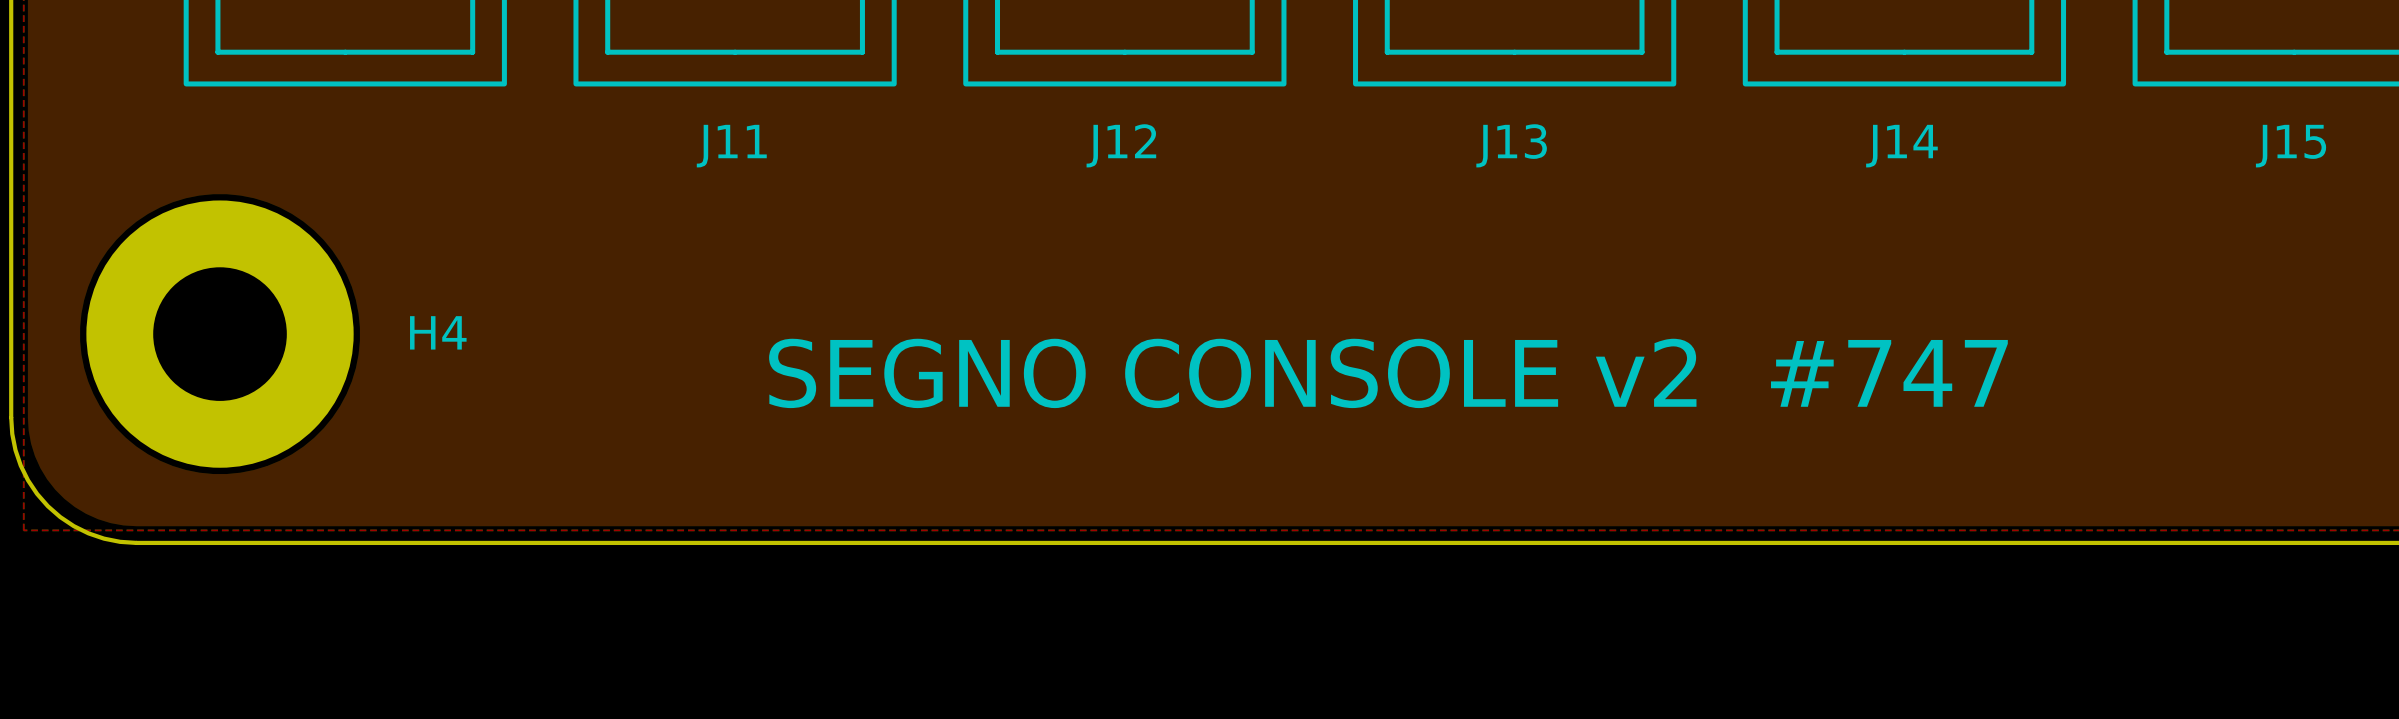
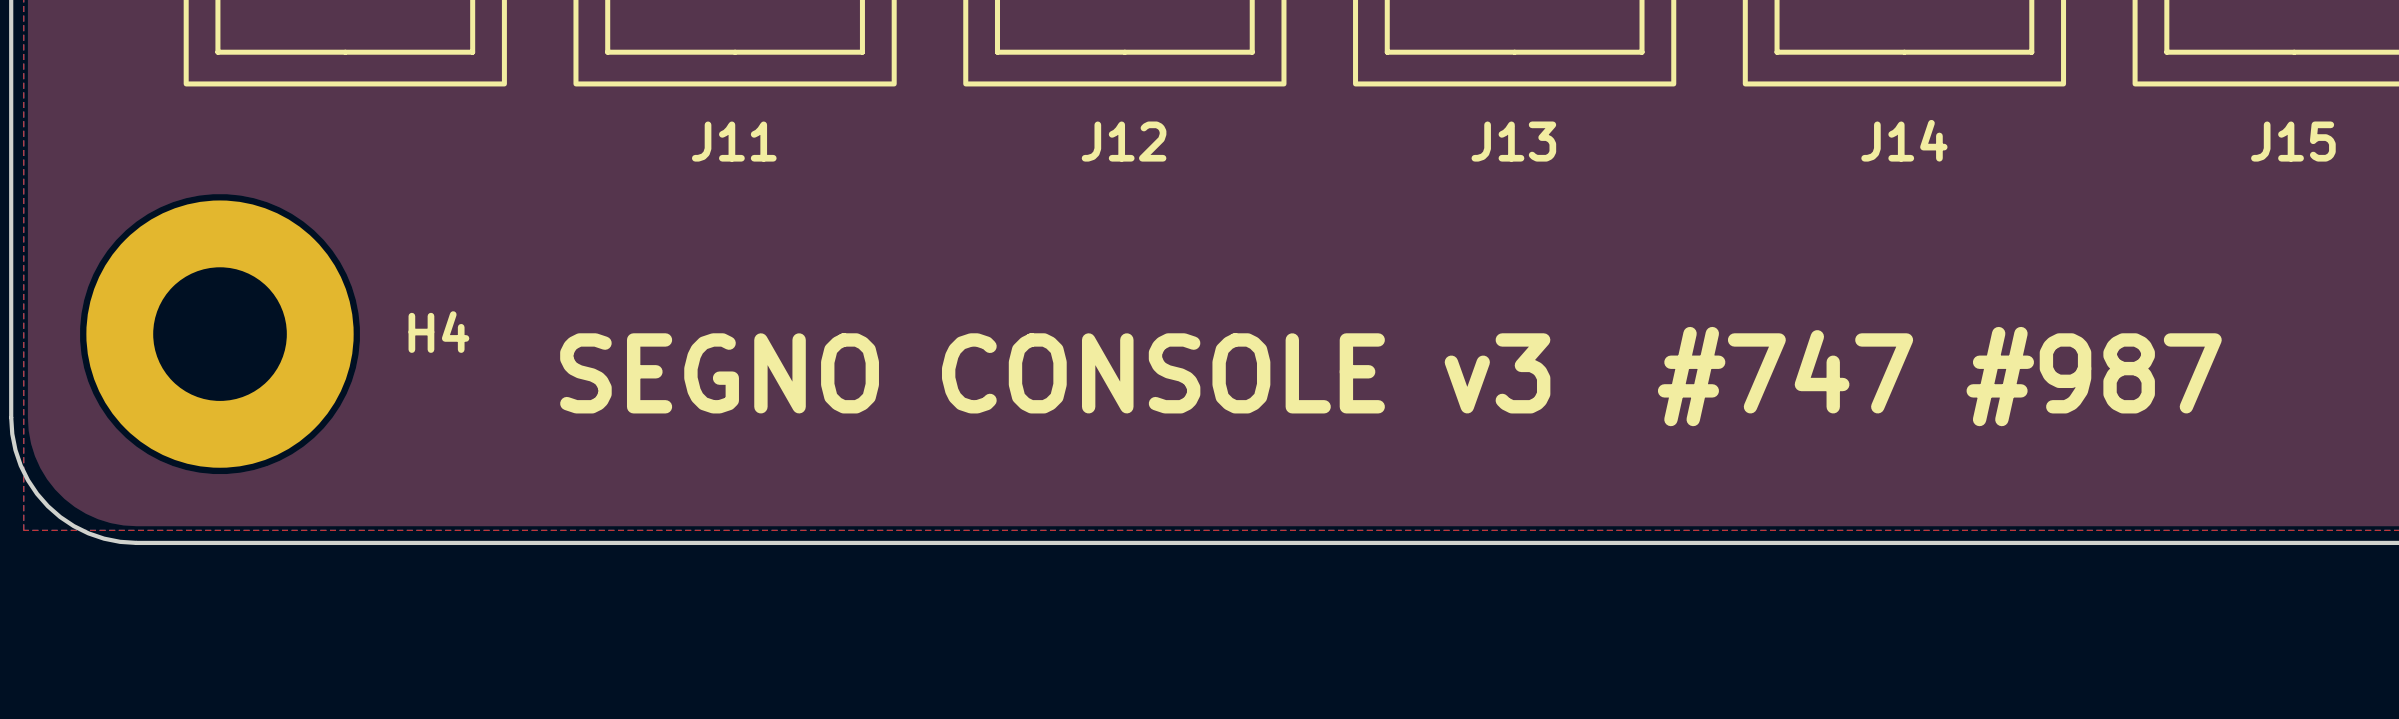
text: SEGNO CONSOLE v2 #747 (1388, 373) -> SEGNO CONSOLE v3 #747 #987 (1390, 376)

